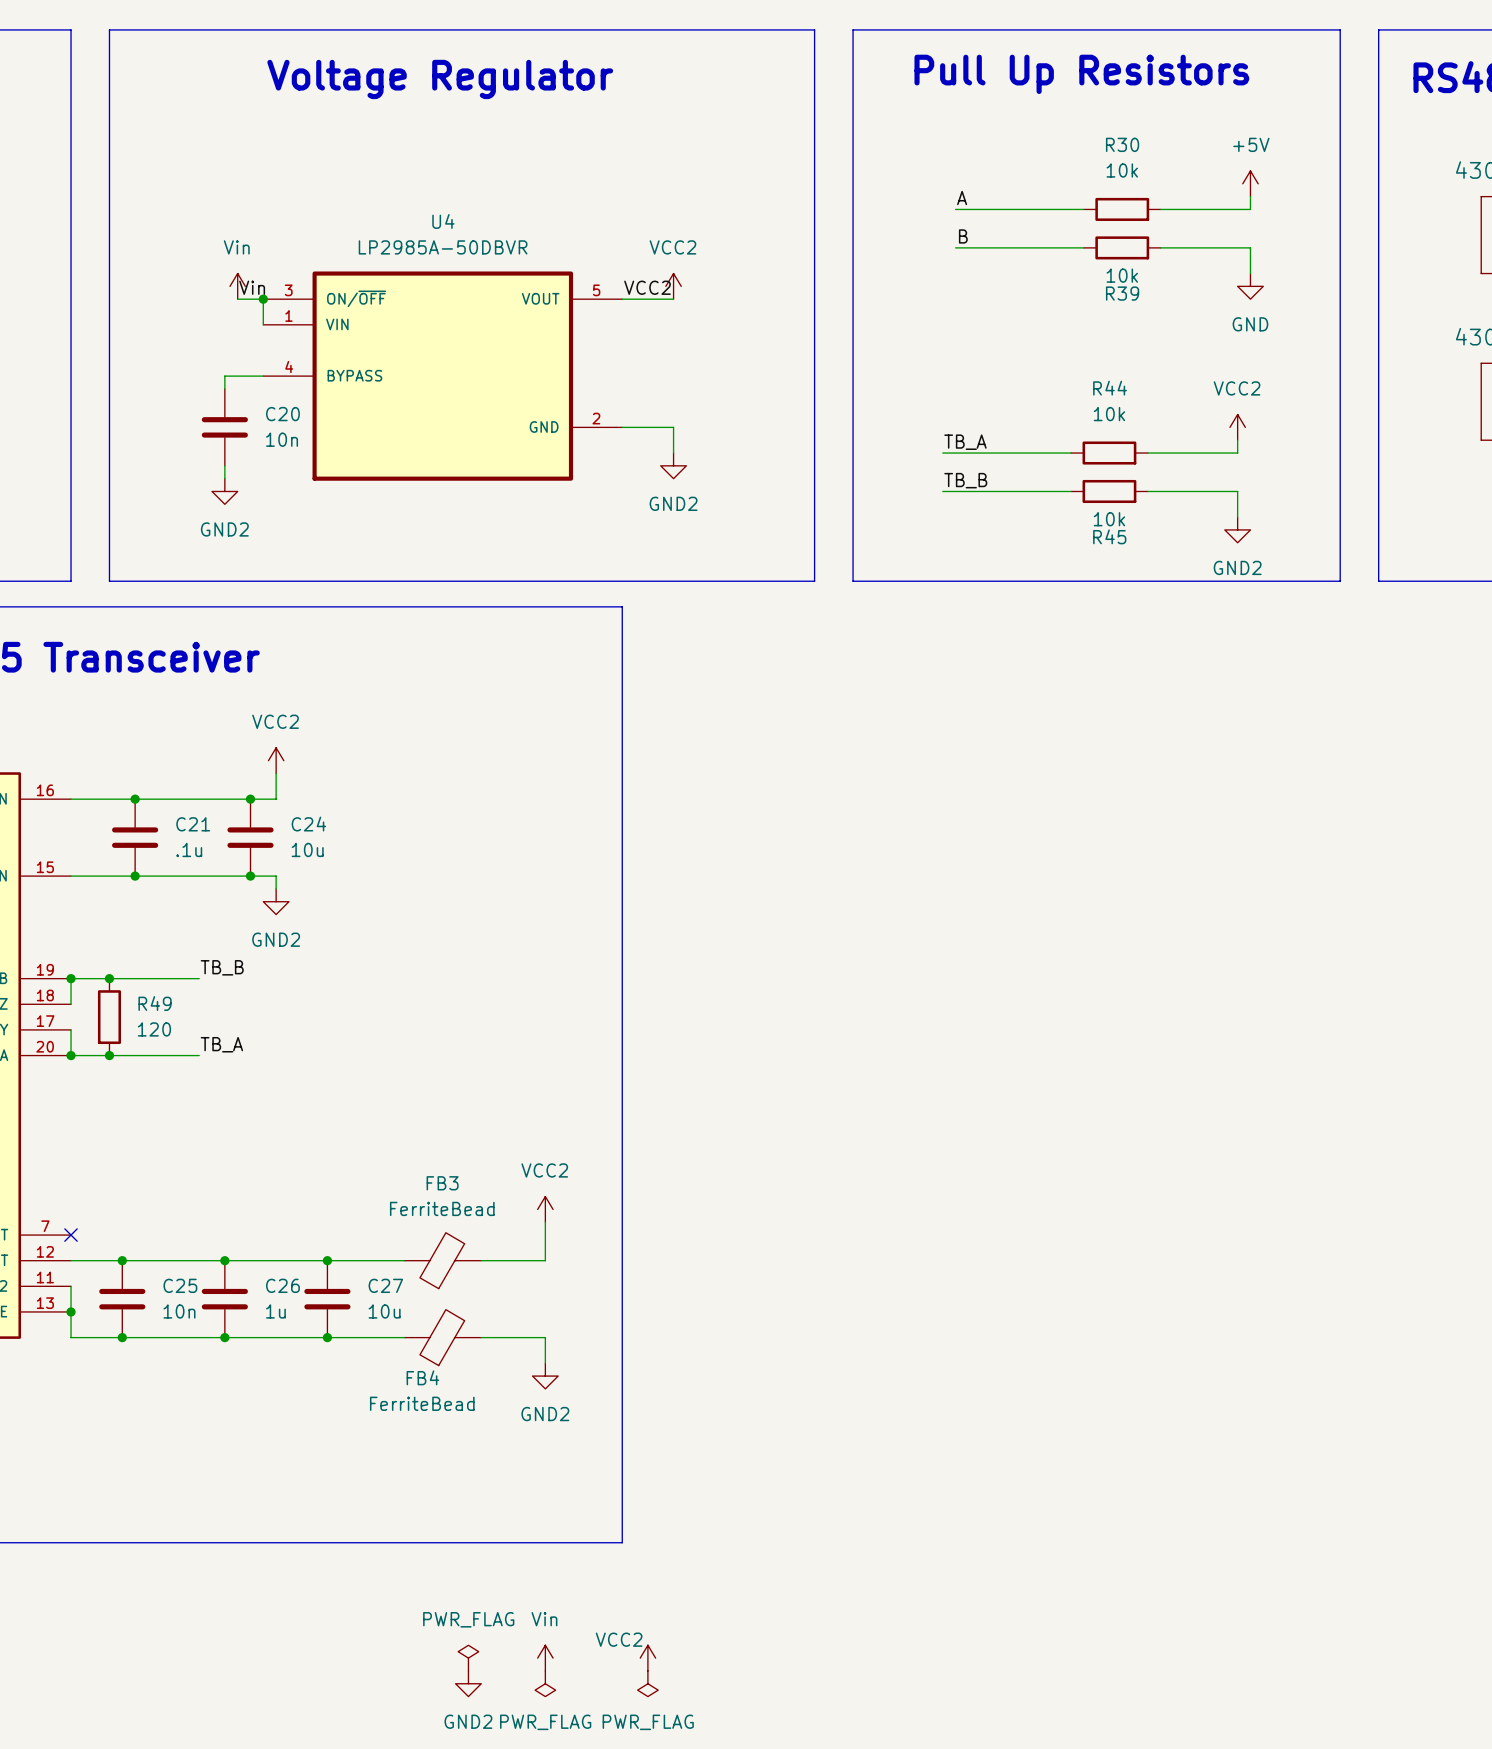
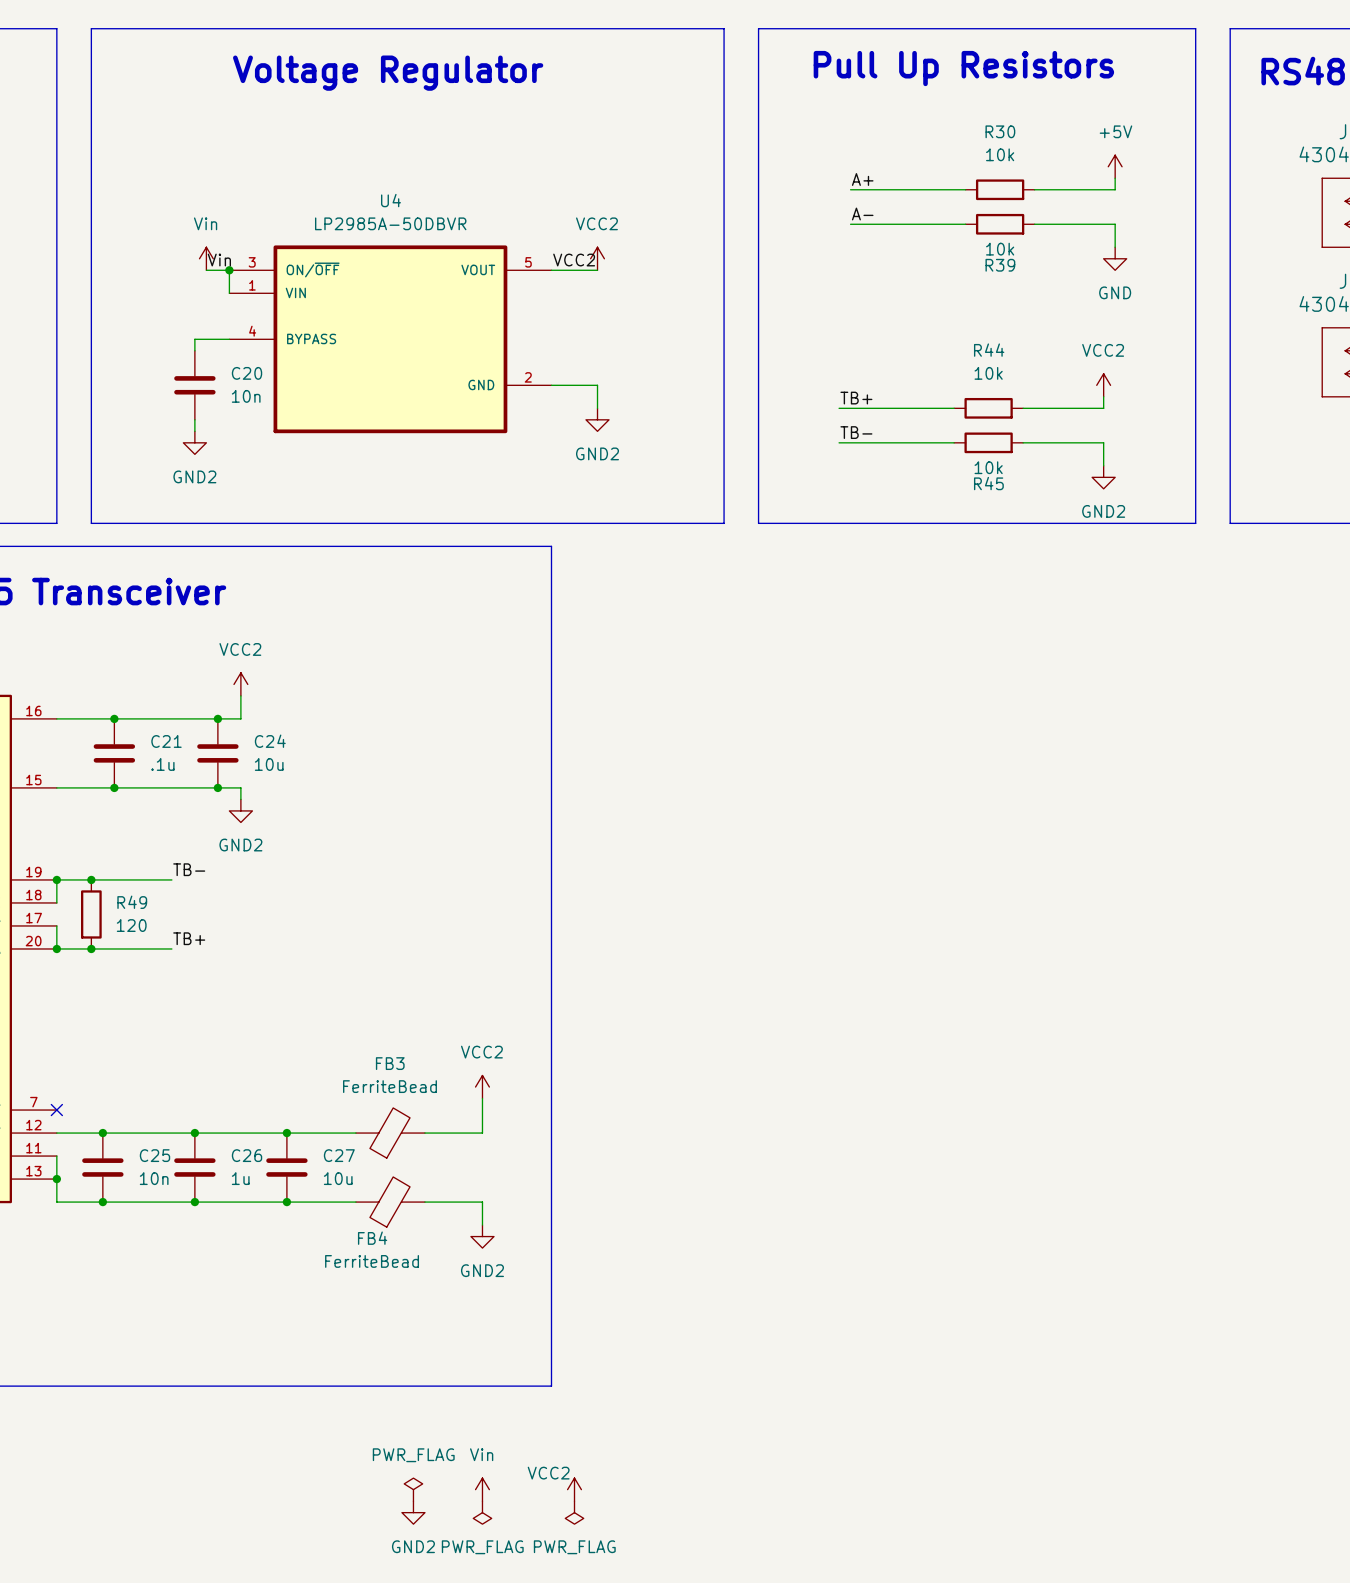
label: A (962, 198) -> A+ (862, 179)
label: B (963, 236) -> A- (862, 214)
label: TB_A (965, 442) -> TB+ (856, 398)
label: TB_B (965, 480) -> TB- (856, 432)
label: TB_B (222, 967) -> TB- (189, 869)
label: TB_A (221, 1044) -> TB+ (189, 938)

